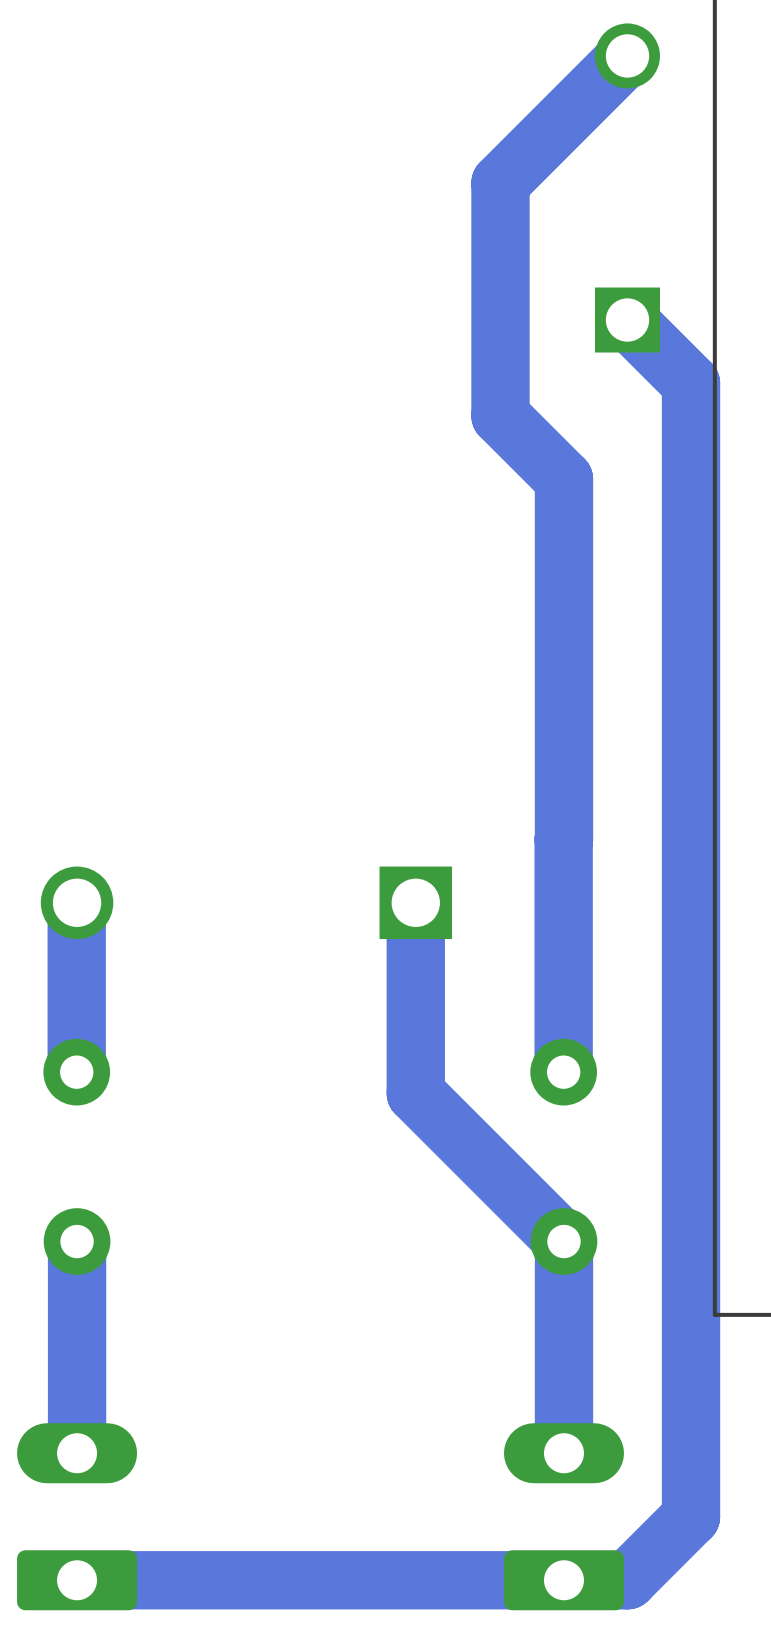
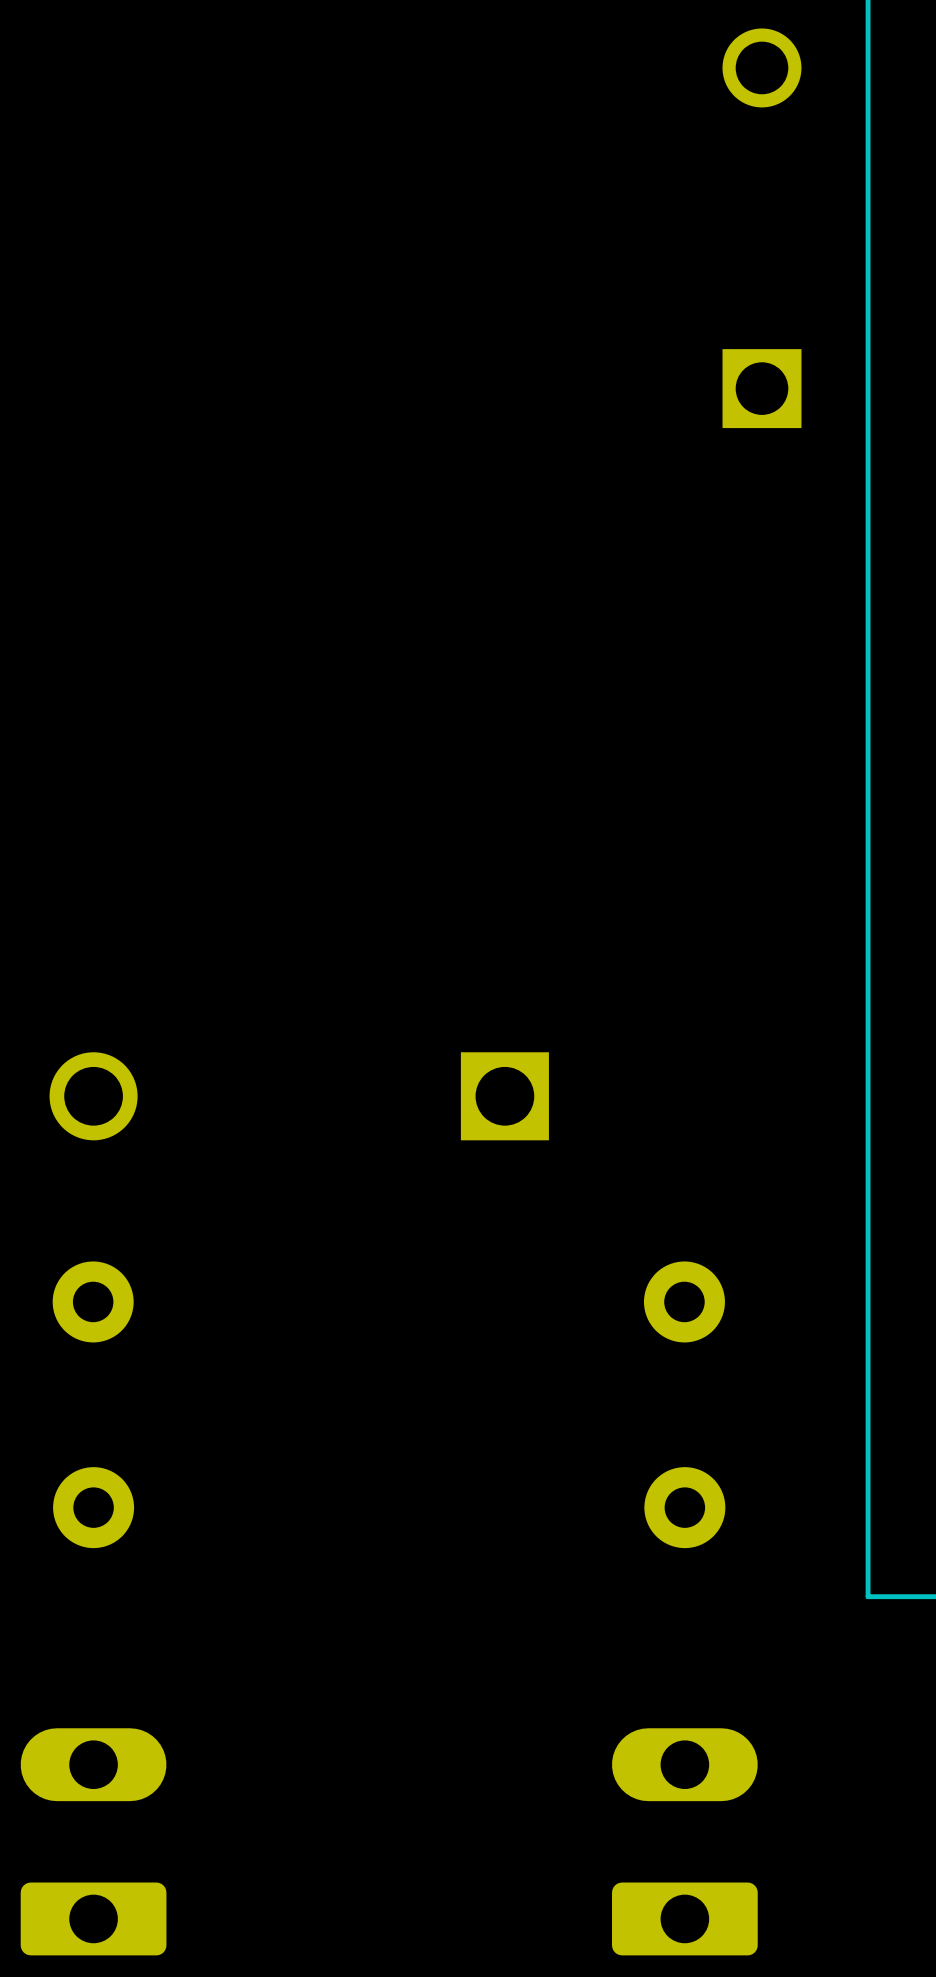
track: (627, 55) (500, 182) (500, 415) (563, 479) (563, 839) -> none
track: (627, 320) (691, 383) (691, 1516) (627, 1580) (77, 1580) -> none
track: (563, 839) (563, 1072) -> none
track: (415, 902) (415, 1093) (563, 1241) (563, 1453) -> none
track: (76, 903) (76, 1072) -> none
track: (77, 1241) (77, 1453) -> none

